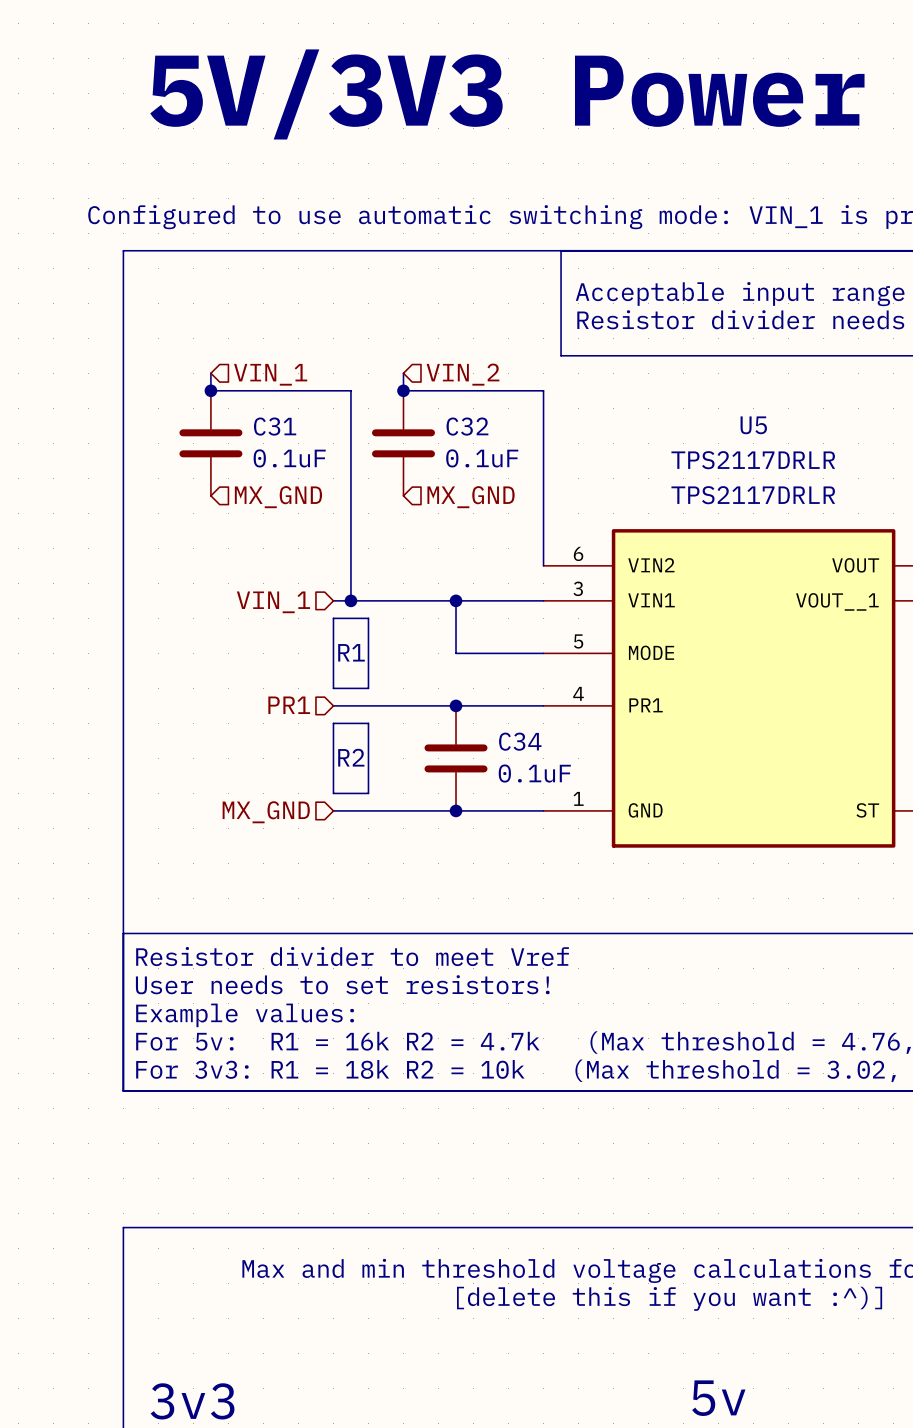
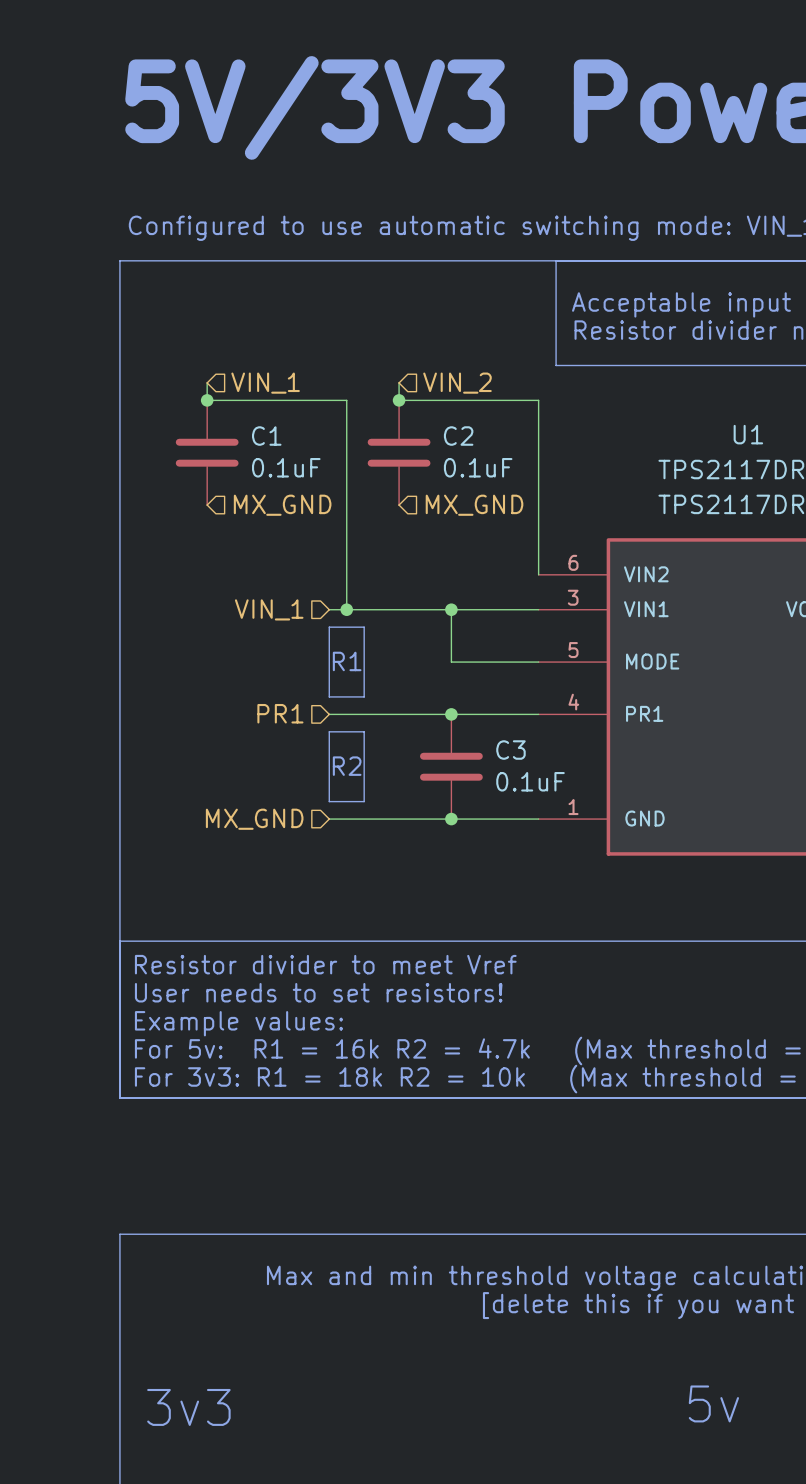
U5 name: U5 (753, 425) -> U1 (748, 434)
C31 name: C31 (275, 426) -> C1 (266, 436)
C32 name: C32 (467, 426) -> C2 (458, 436)
C34 name: C34 (520, 741) -> C3 (510, 750)

